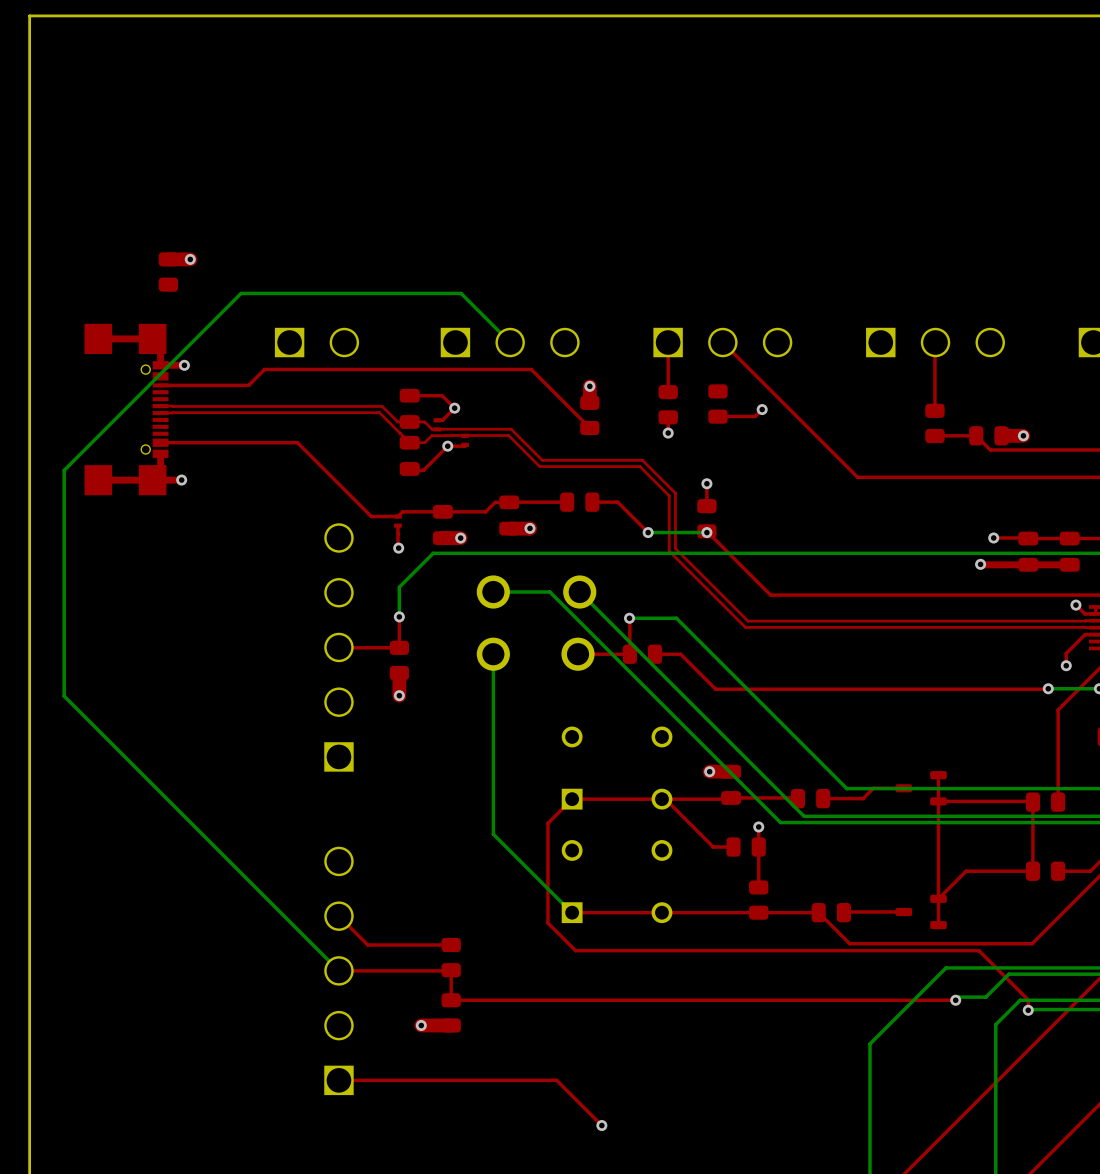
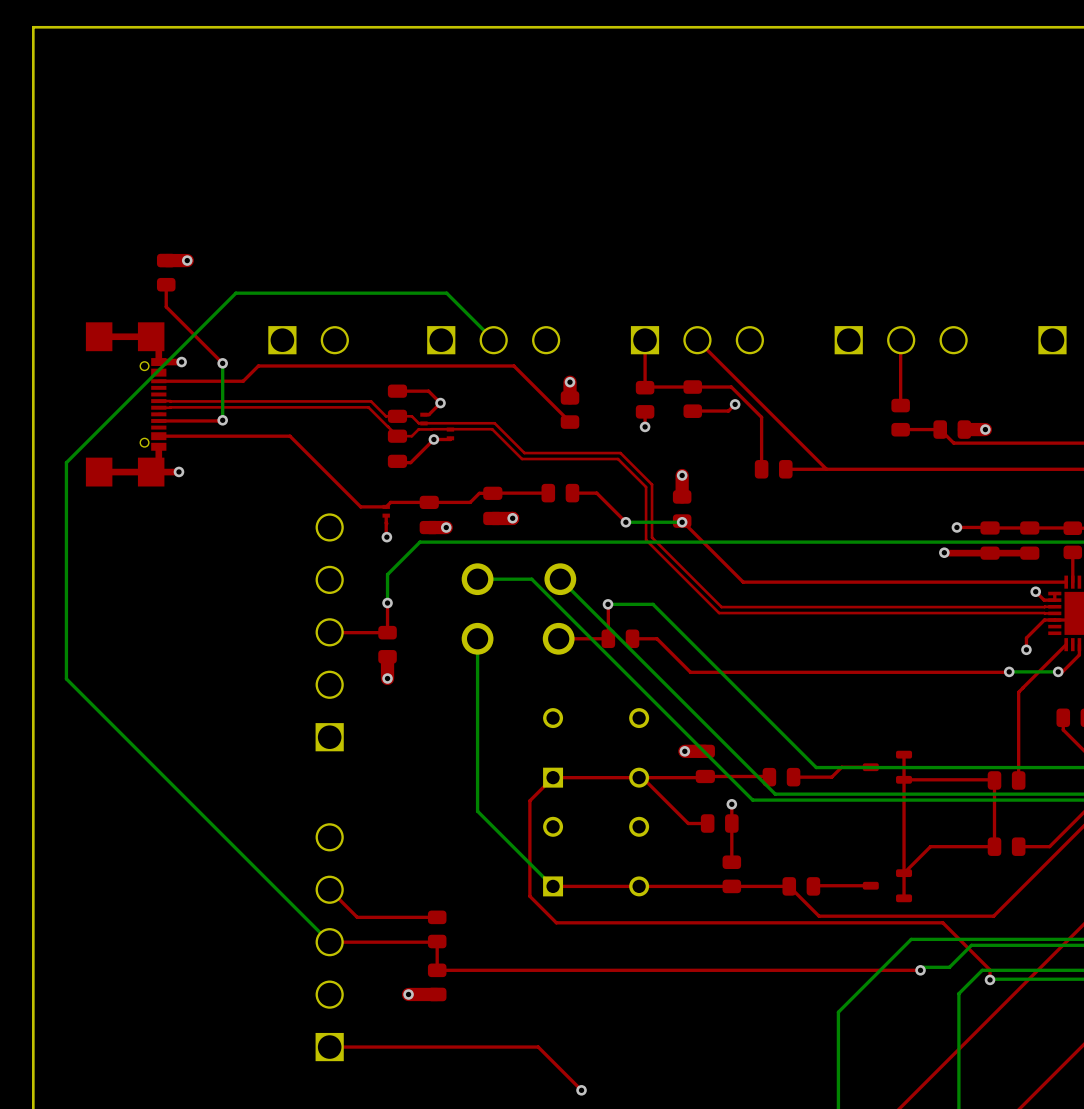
top track: none -> (166, 284) (166, 306) (222, 363)
bottom track: none -> (222, 363) (222, 420)
via: none -> (222, 363)
top track: none -> (645, 387) (731, 387) (761, 417) (761, 469)
top track: none -> (222, 420) (158, 420)
via: none -> (222, 420)
part: none -> (773, 469)
top track: none -> (826, 469) (785, 469)
top track width: thin (706, 483) (706, 506) -> thick (682, 475) (682, 496)

